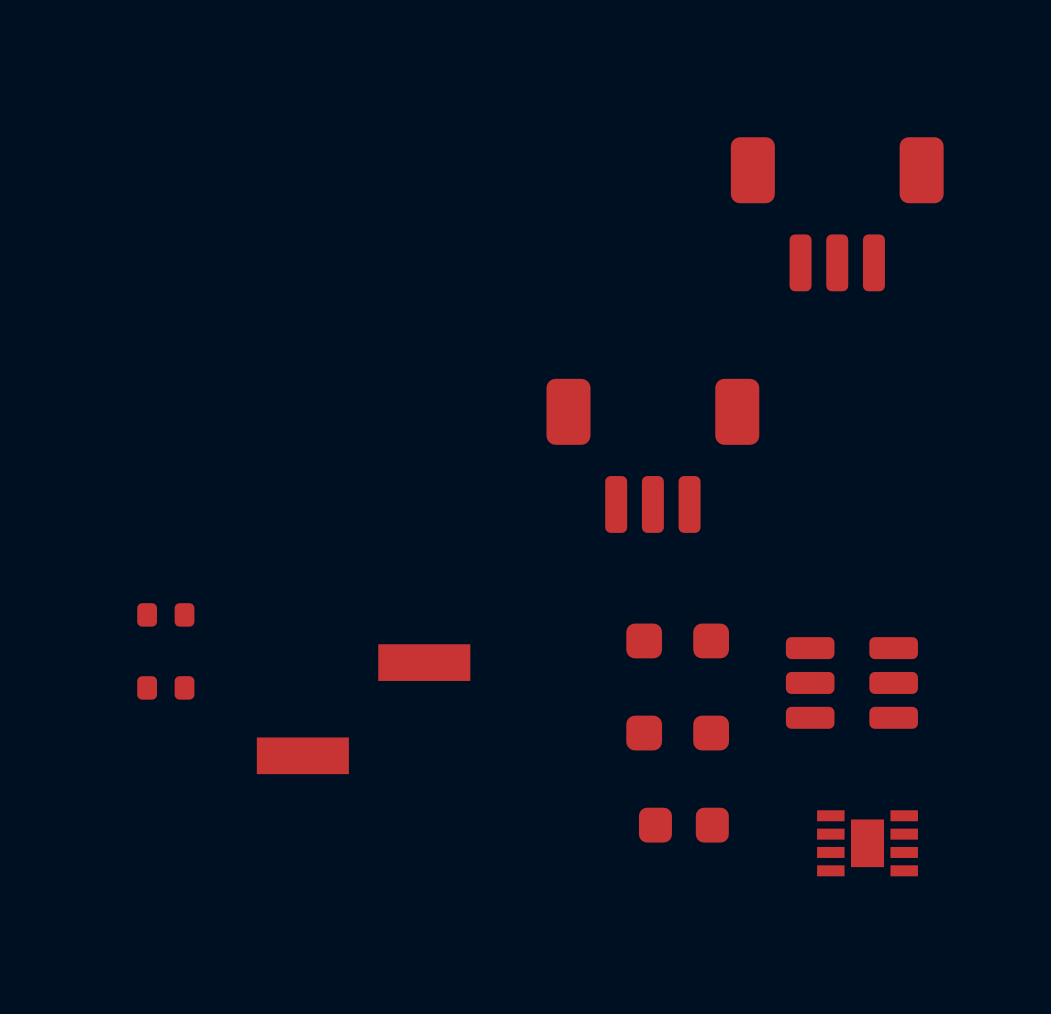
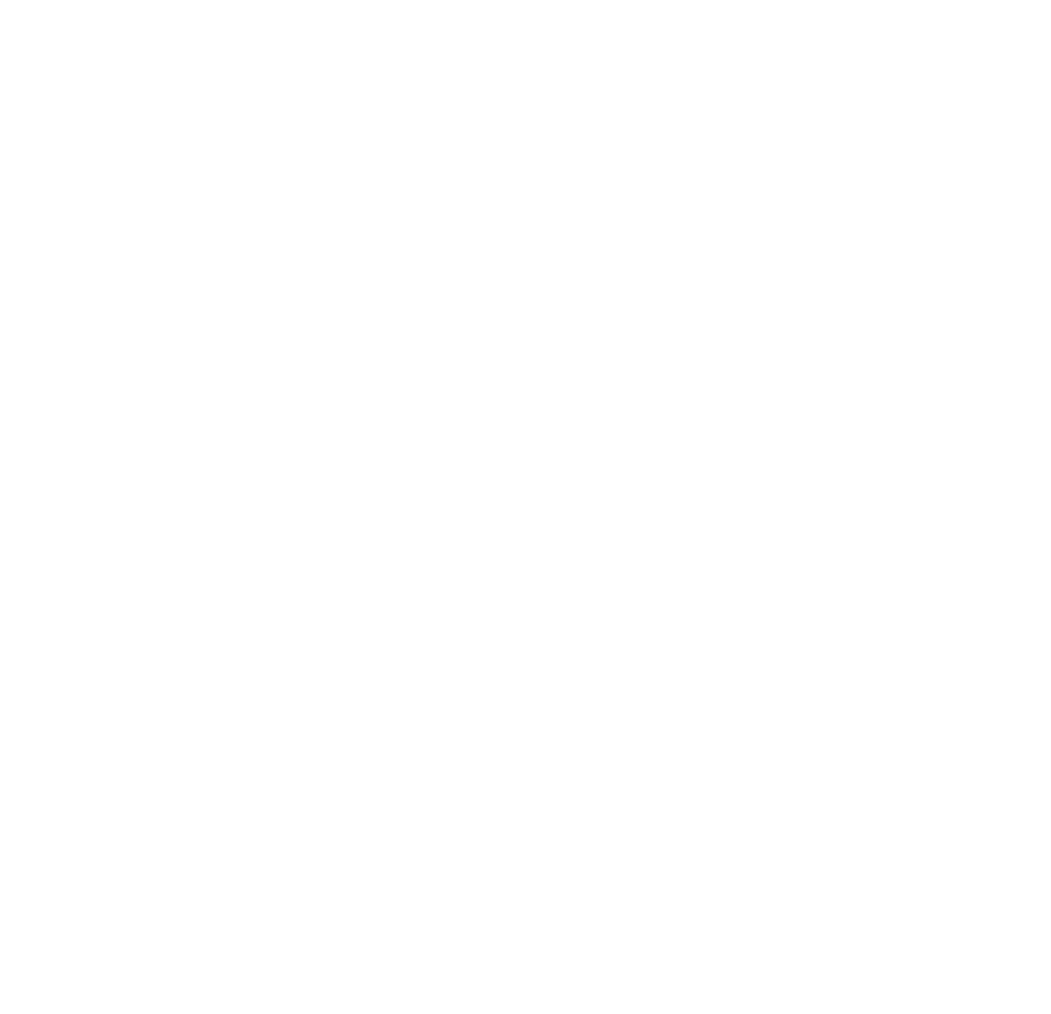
part: (837, 214) -> none
part: (652, 455) -> none
part: (165, 614) -> none
part: (677, 640) -> none
part: (851, 682) -> none
part: (165, 687) -> none
part: (363, 709) -> none
part: (677, 733) -> none
part: (683, 825) -> none
part: (867, 843) -> none

